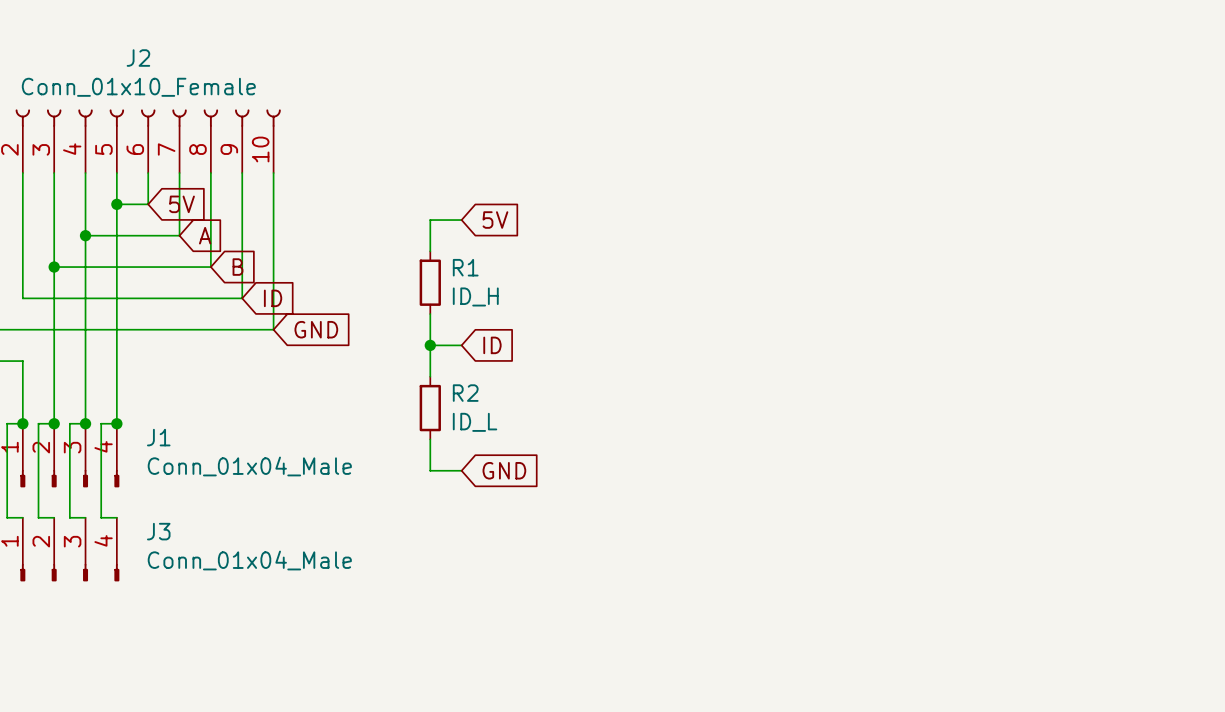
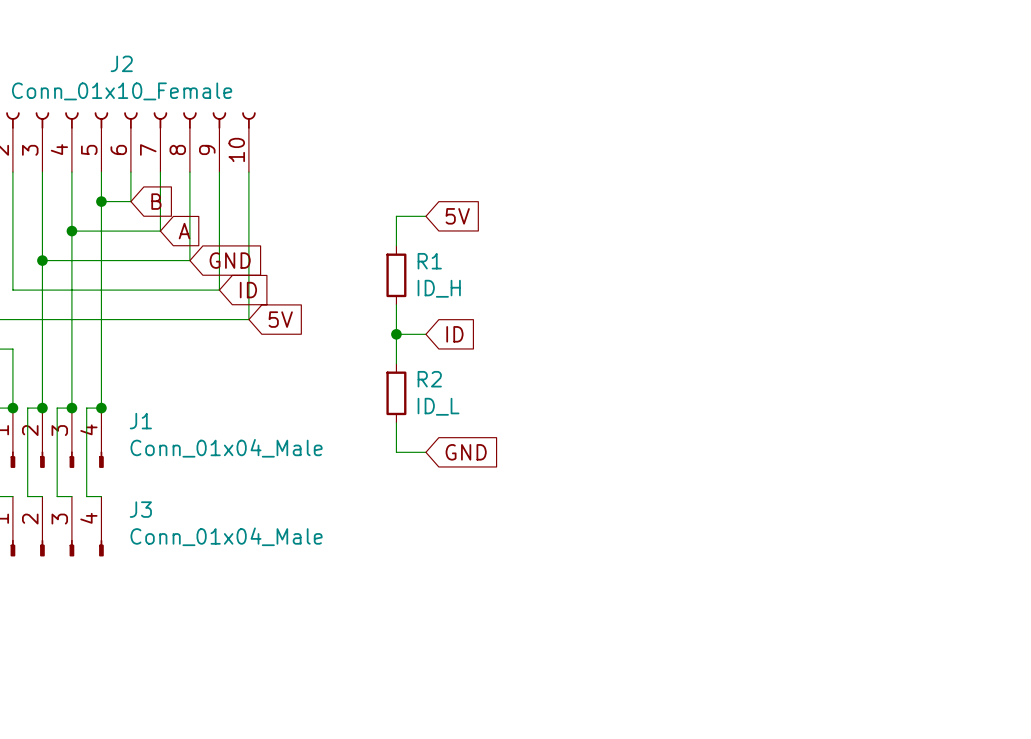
global label: 5V (182, 204) -> B (156, 201)
global label: B (237, 267) -> GND (230, 260)
global label: GND (316, 329) -> 5V (280, 319)

